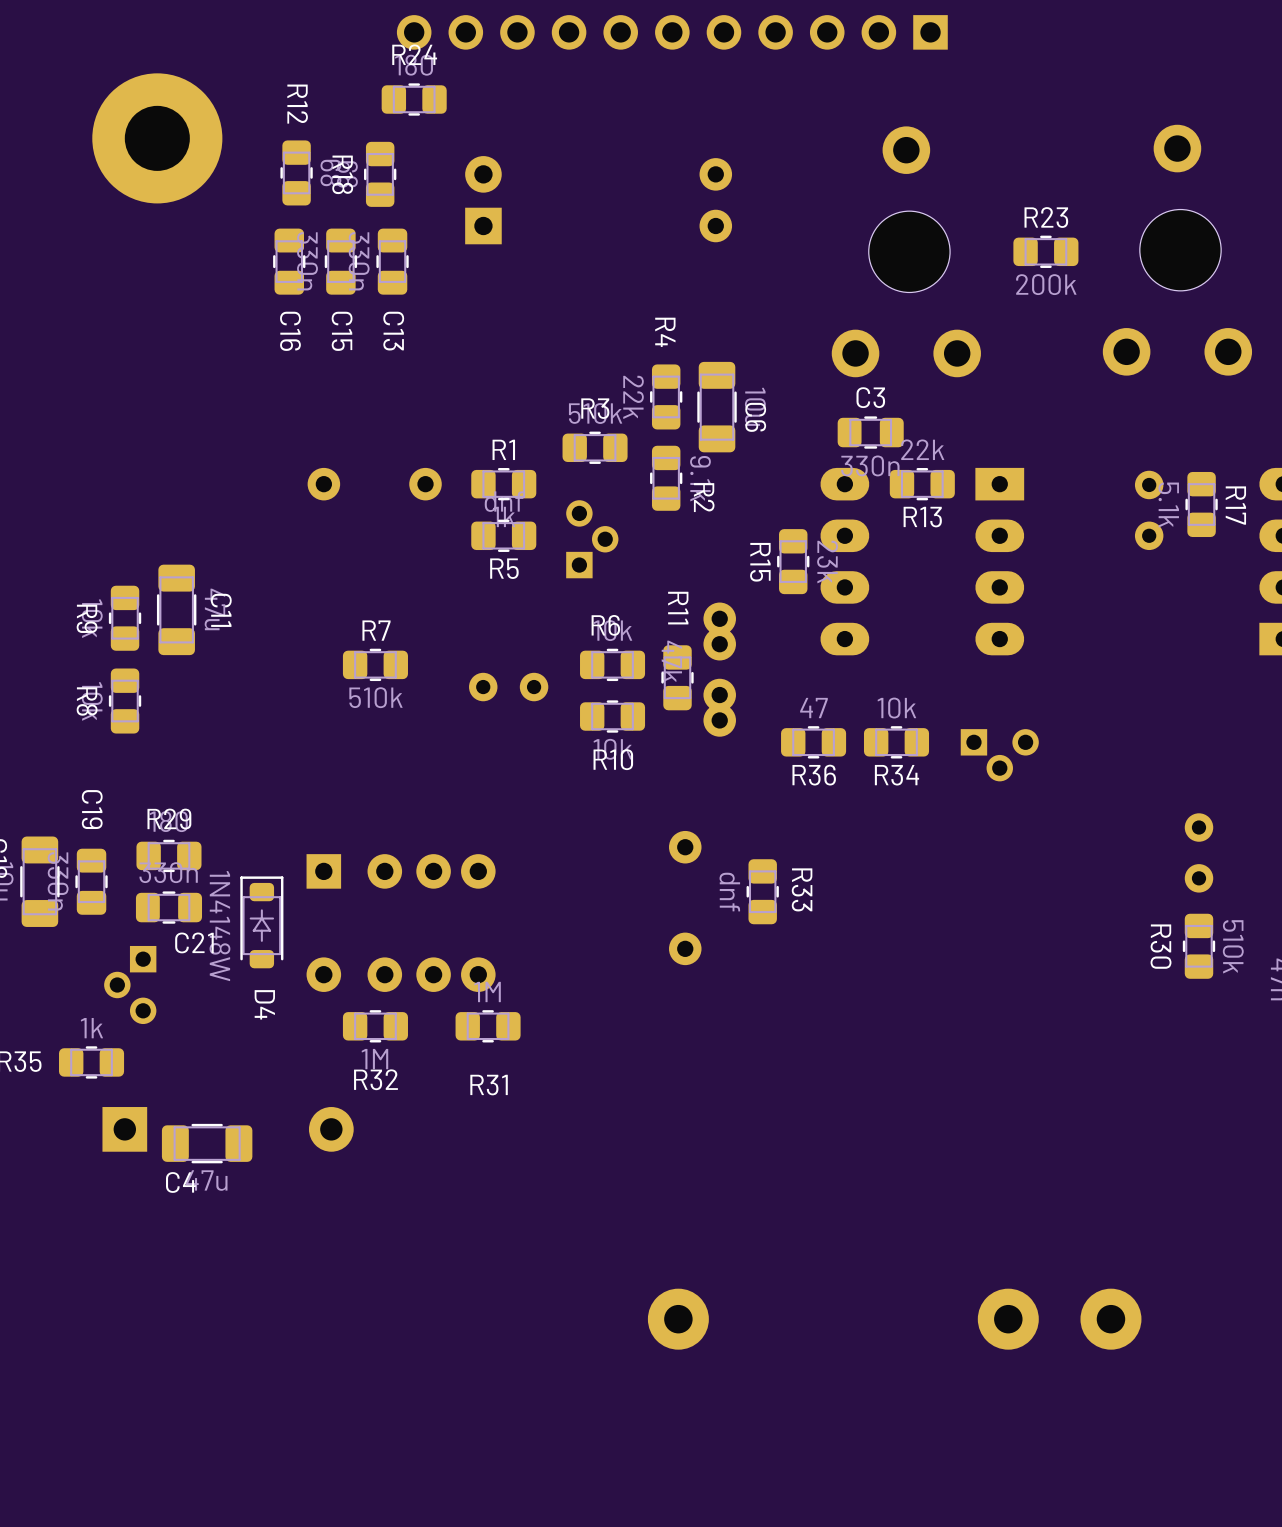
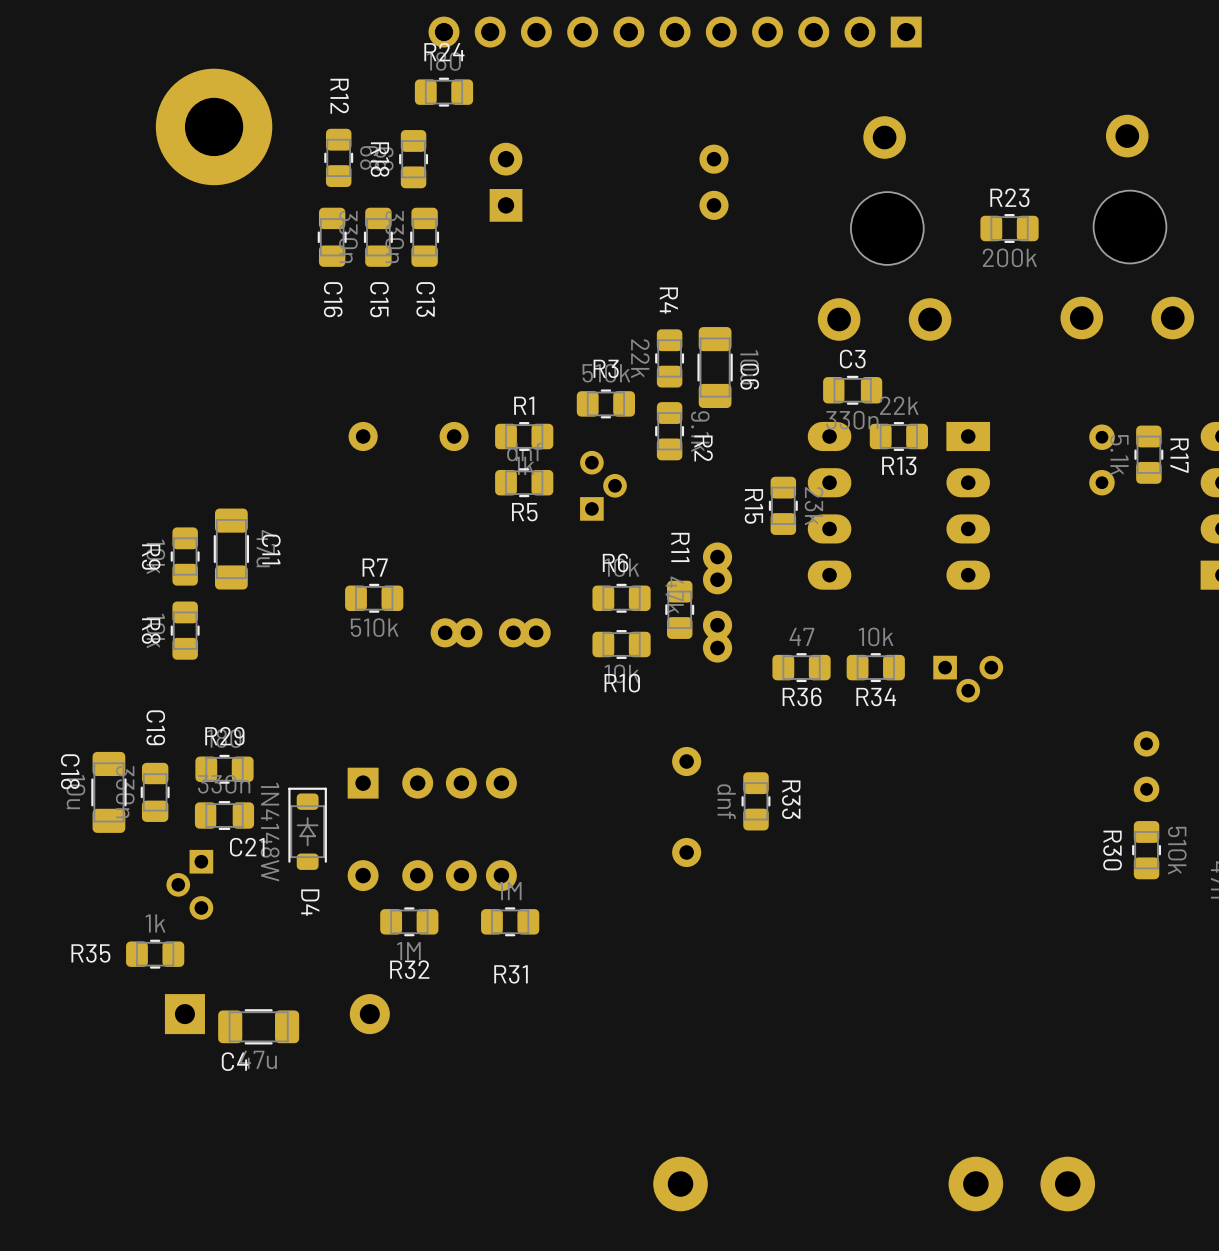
R7 position: (375, 664) -> (374, 598)
part: (508, 687) -> none
part: none -> (490, 632)

